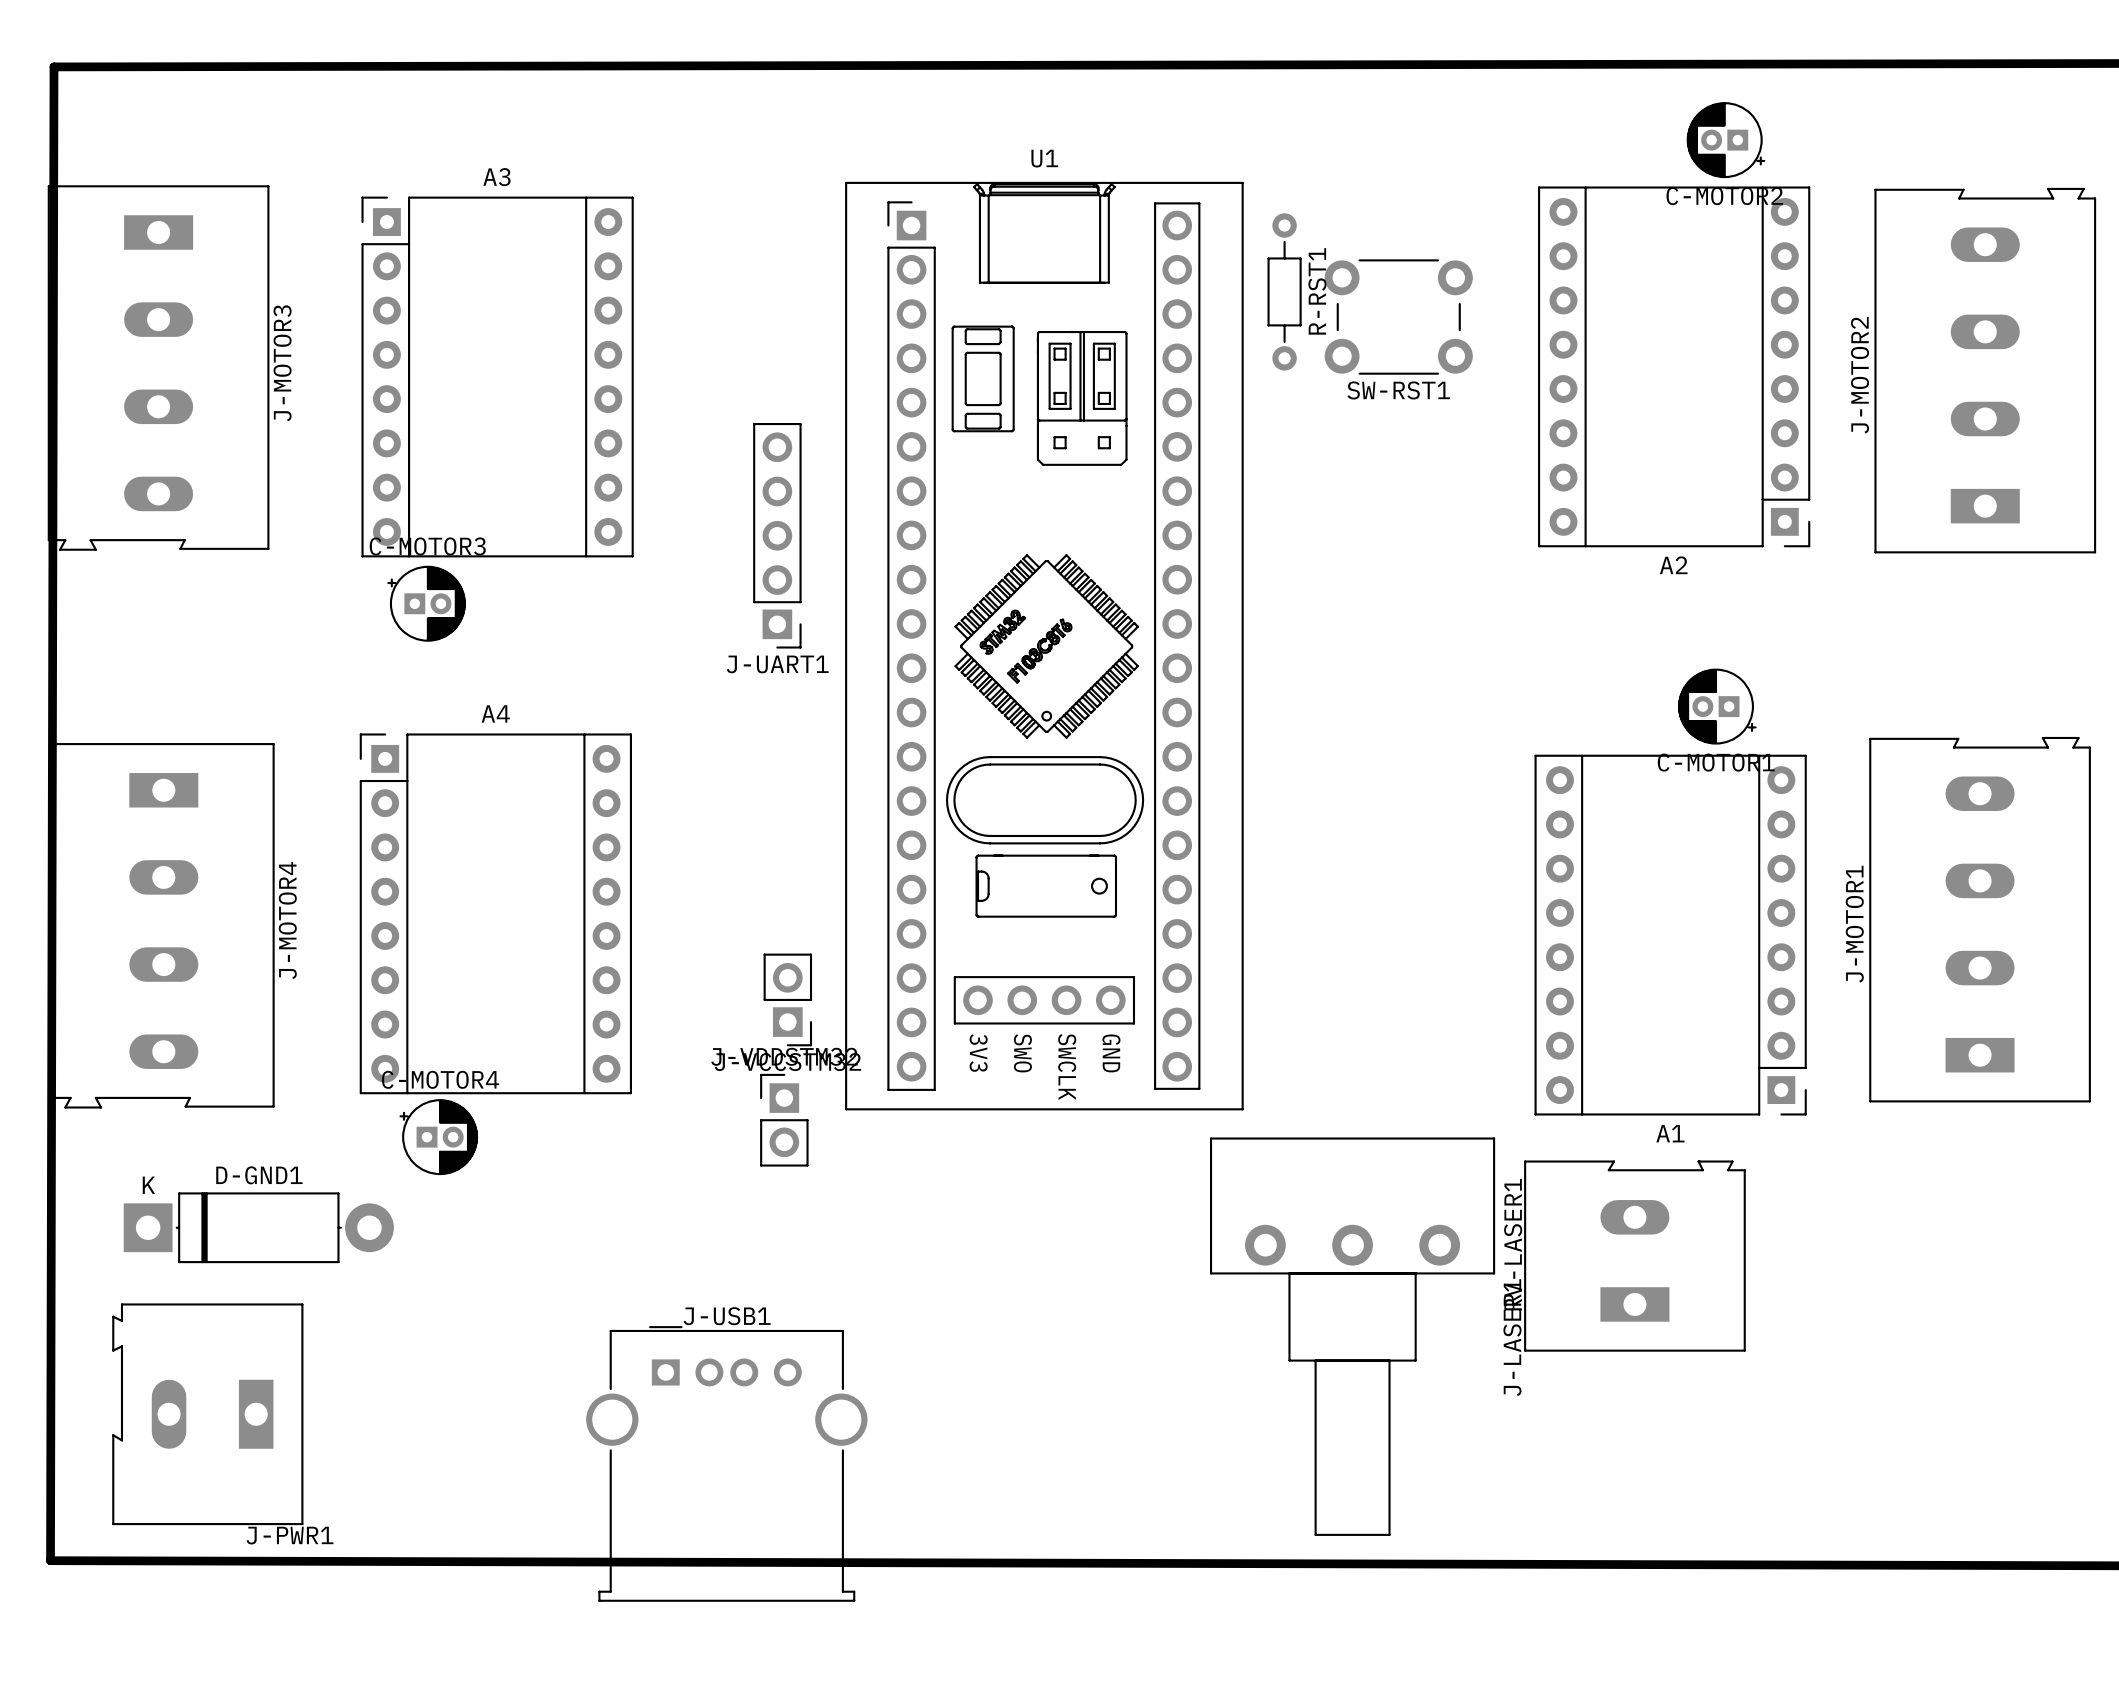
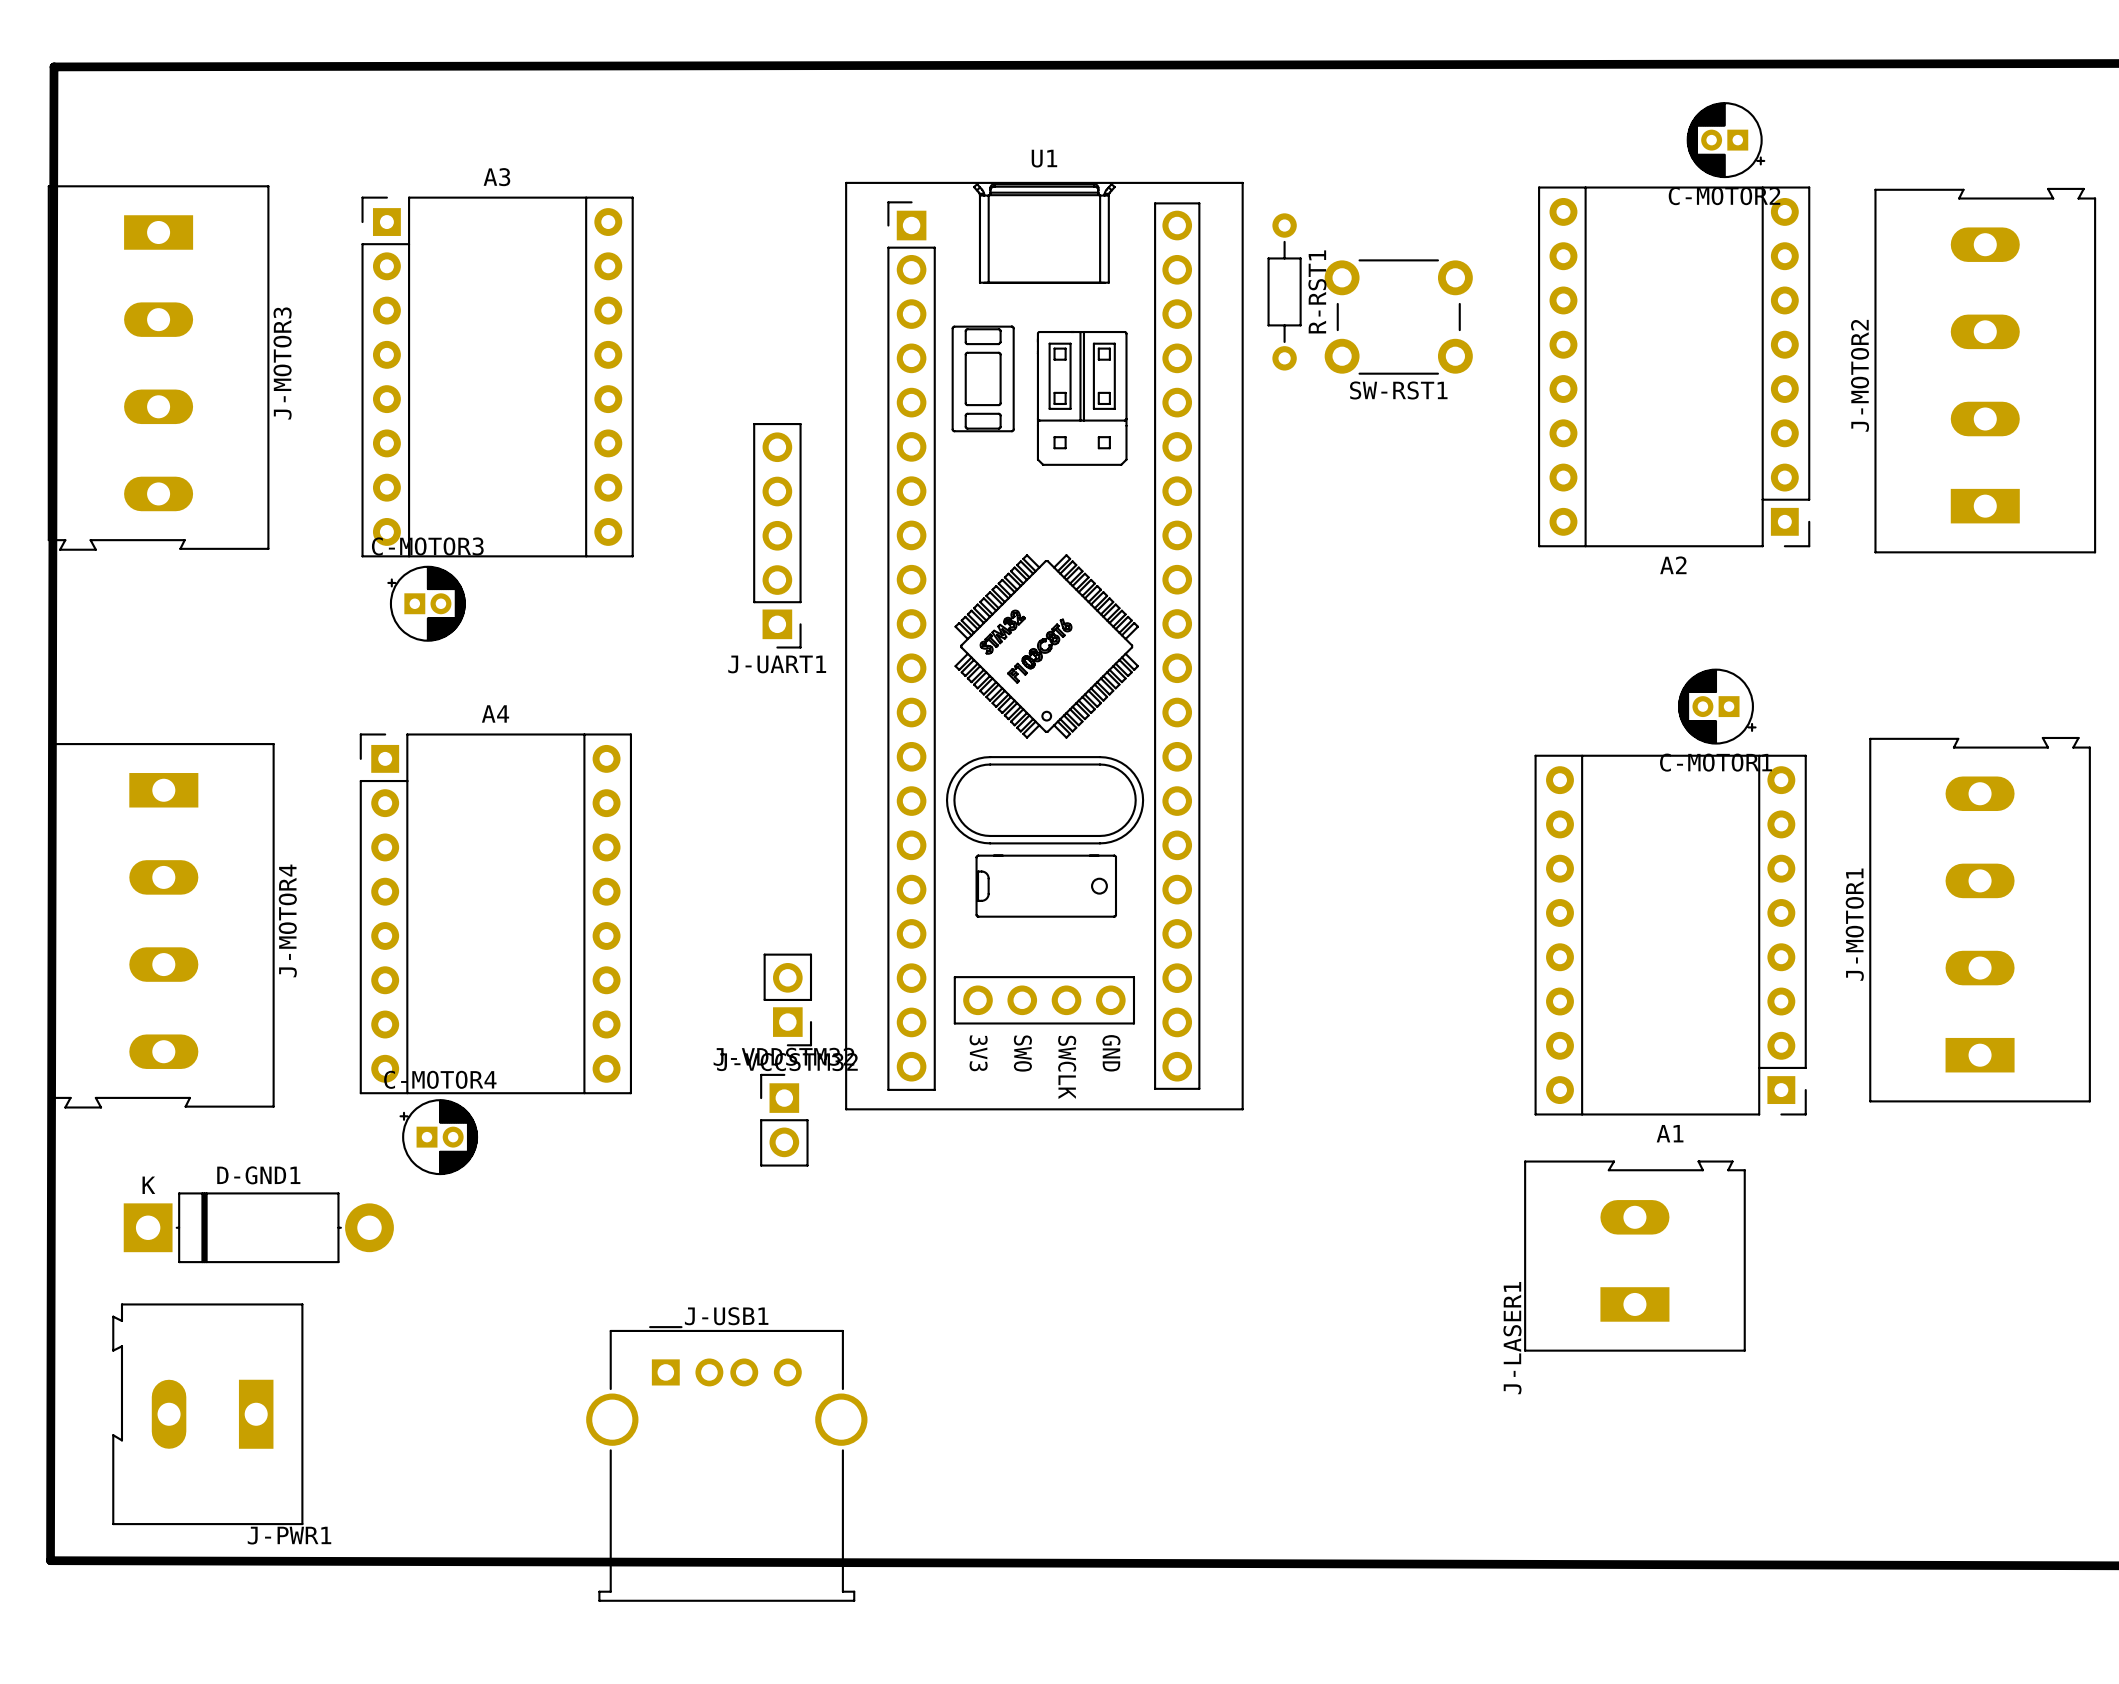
RV-LASER1: (1352, 1336) -> none

